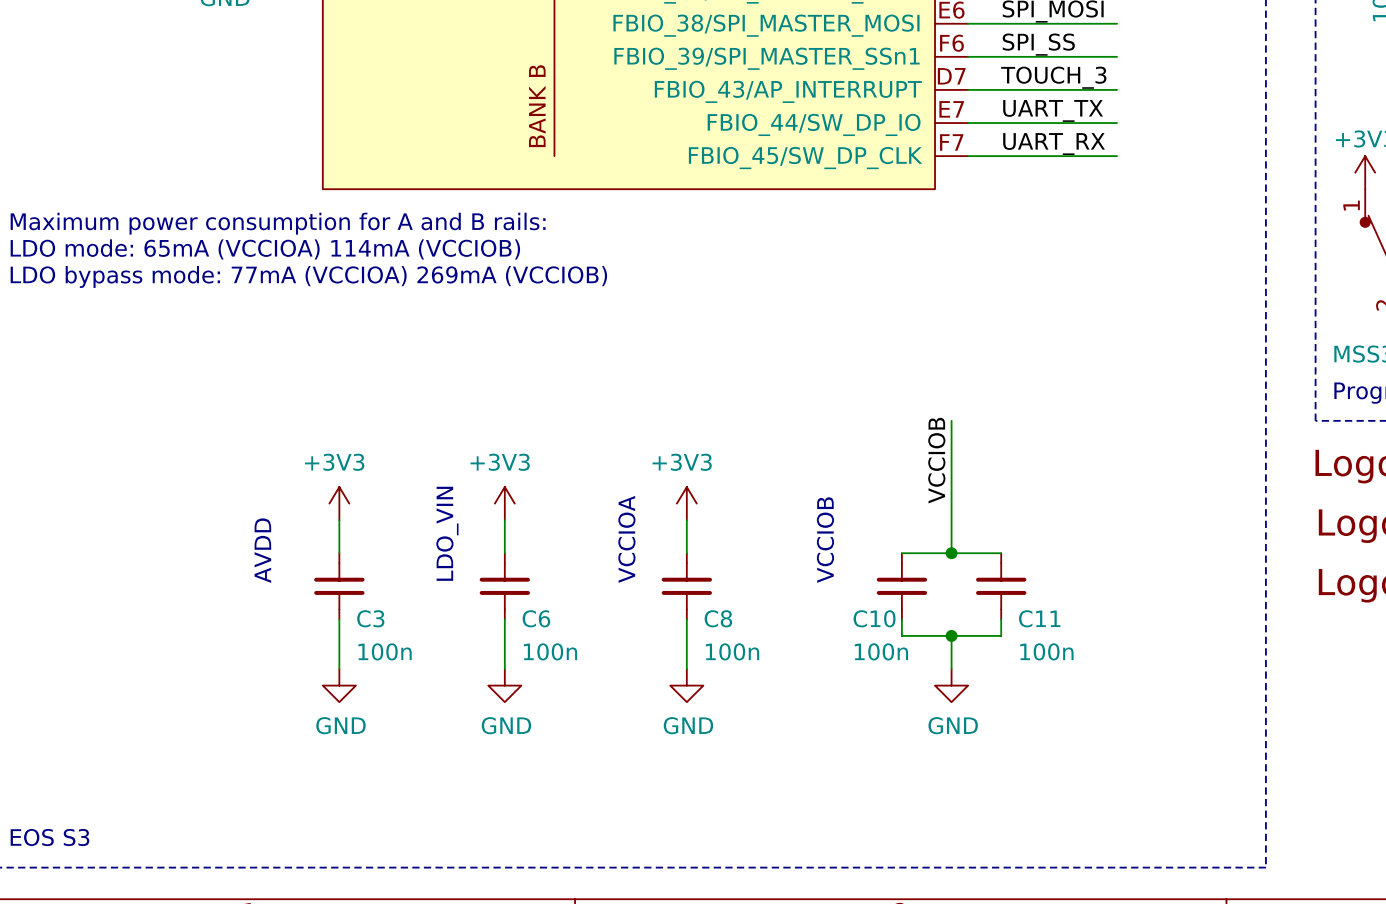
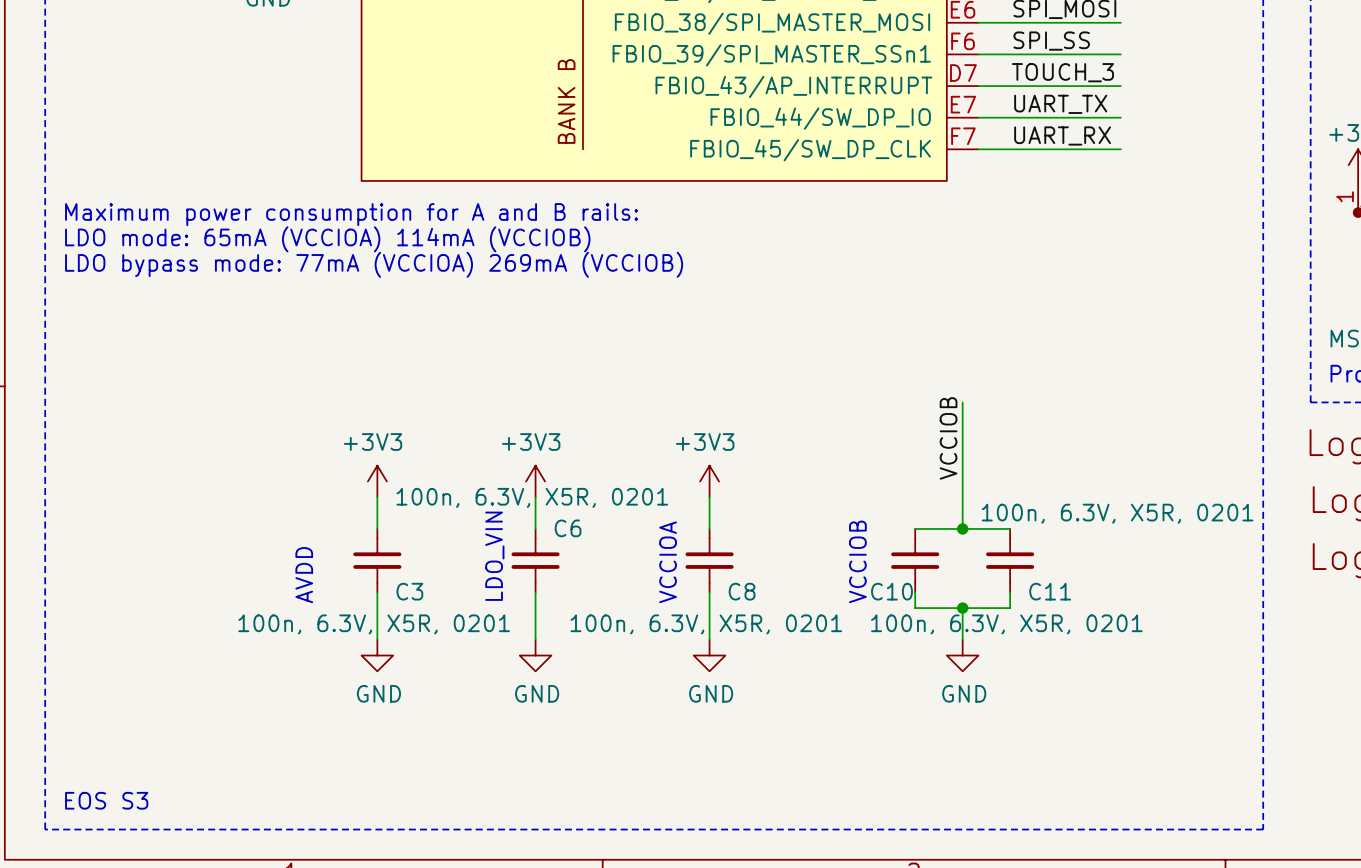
text position: LDO_VIN (447, 533) -> LDO_VIN (494, 556)
text position: VCCIOA (626, 539) -> VCCIOA (668, 562)
text position: VCCIOB (825, 540) -> VCCIOB (857, 561)
text position: AVDD (262, 550) -> AVDD (304, 575)
C6 name position: C6 (536, 618) -> C6 (568, 528)
C3 value: 100n (385, 651) -> 100n, 6.3V, X5R, 0201 (374, 624)
C6 value: 100n (550, 651) -> 100n, 6.3V, X5R, 0201 (532, 497)
C8 value: 100n (732, 651) -> 100n, 6.3V, X5R, 0201 (706, 624)
C10 value: 100n (881, 651) -> 100n, 6.3V, X5R, 0201 (1006, 624)
C11 value: 100n (1046, 651) -> 100n, 6.3V, X5R, 0201 (1117, 513)

